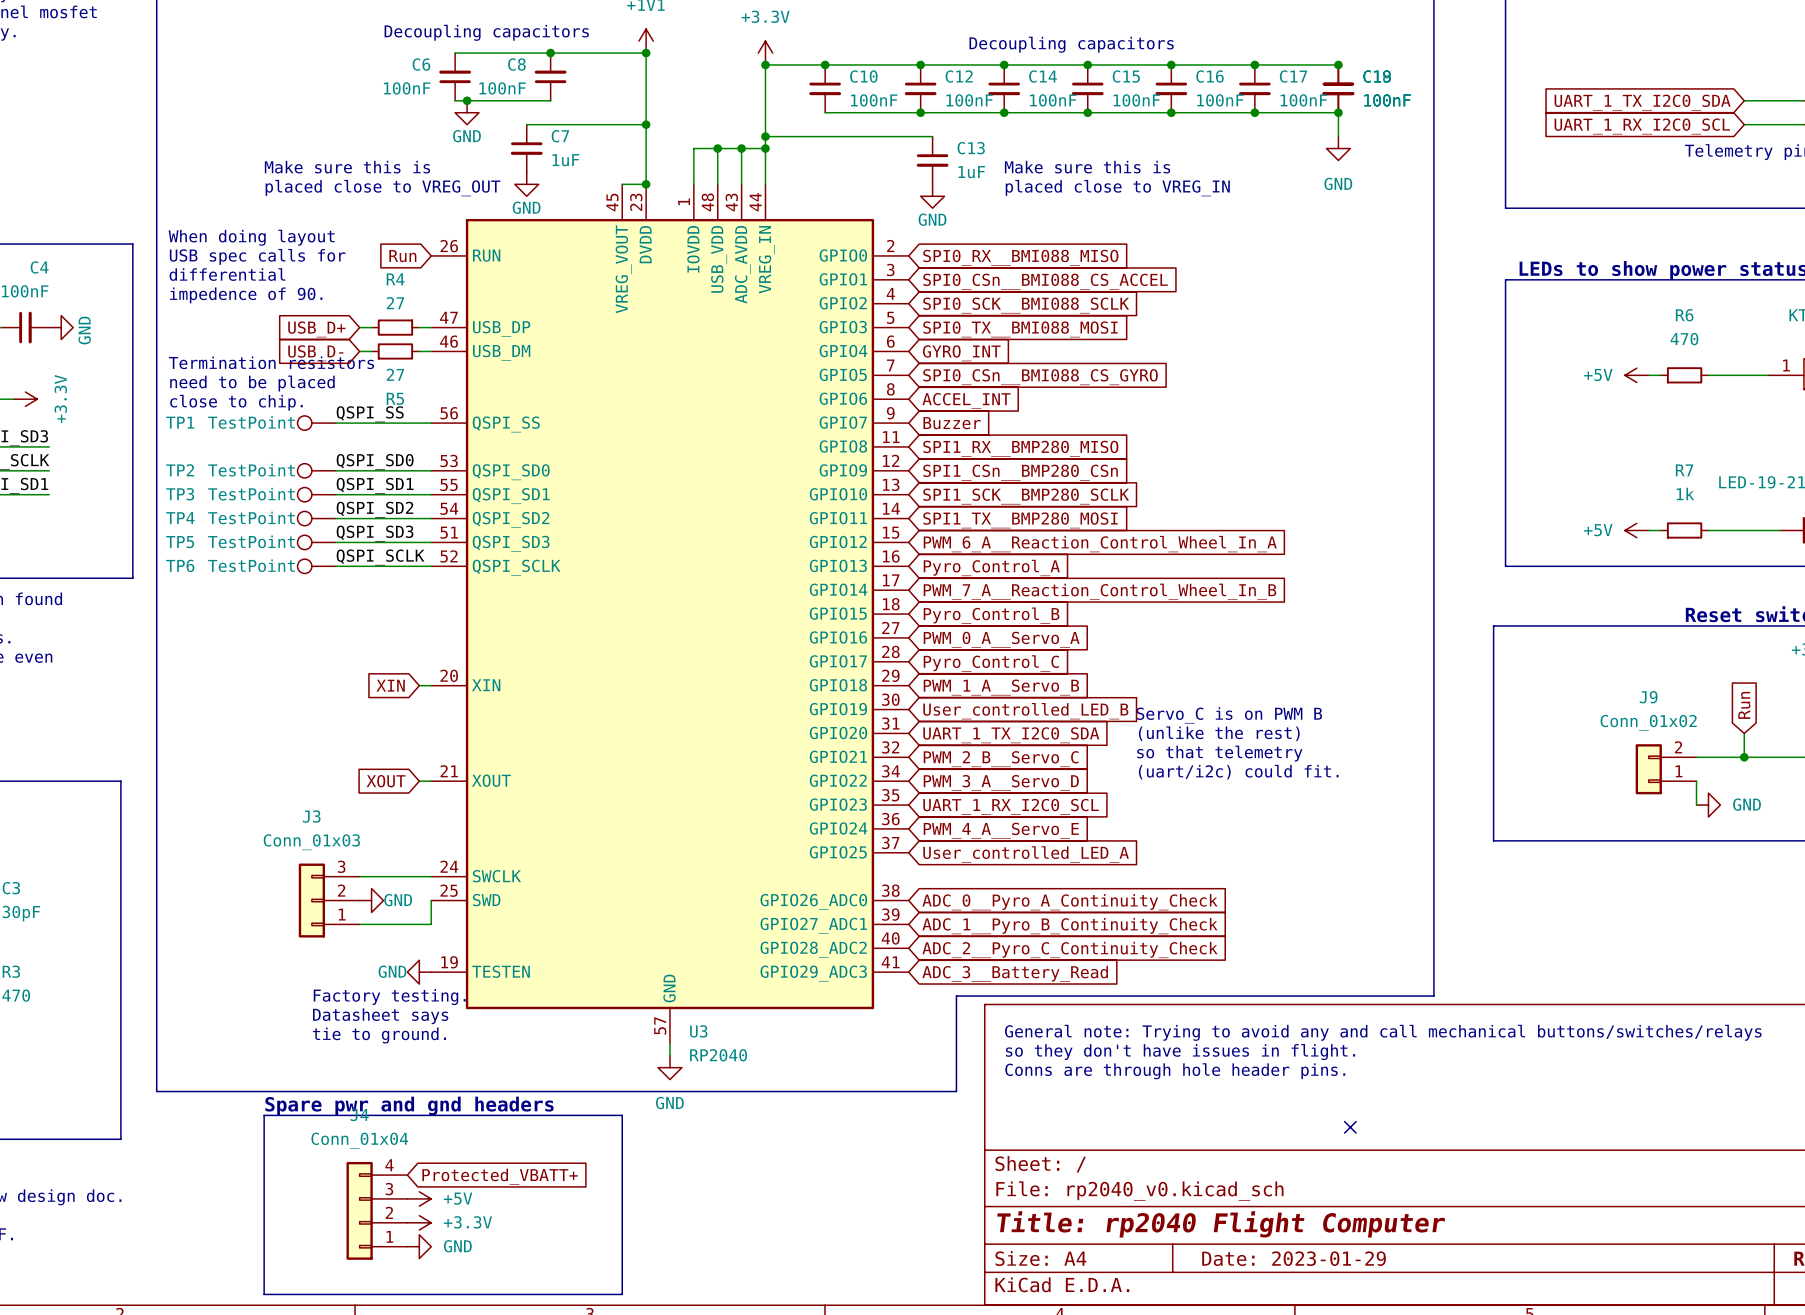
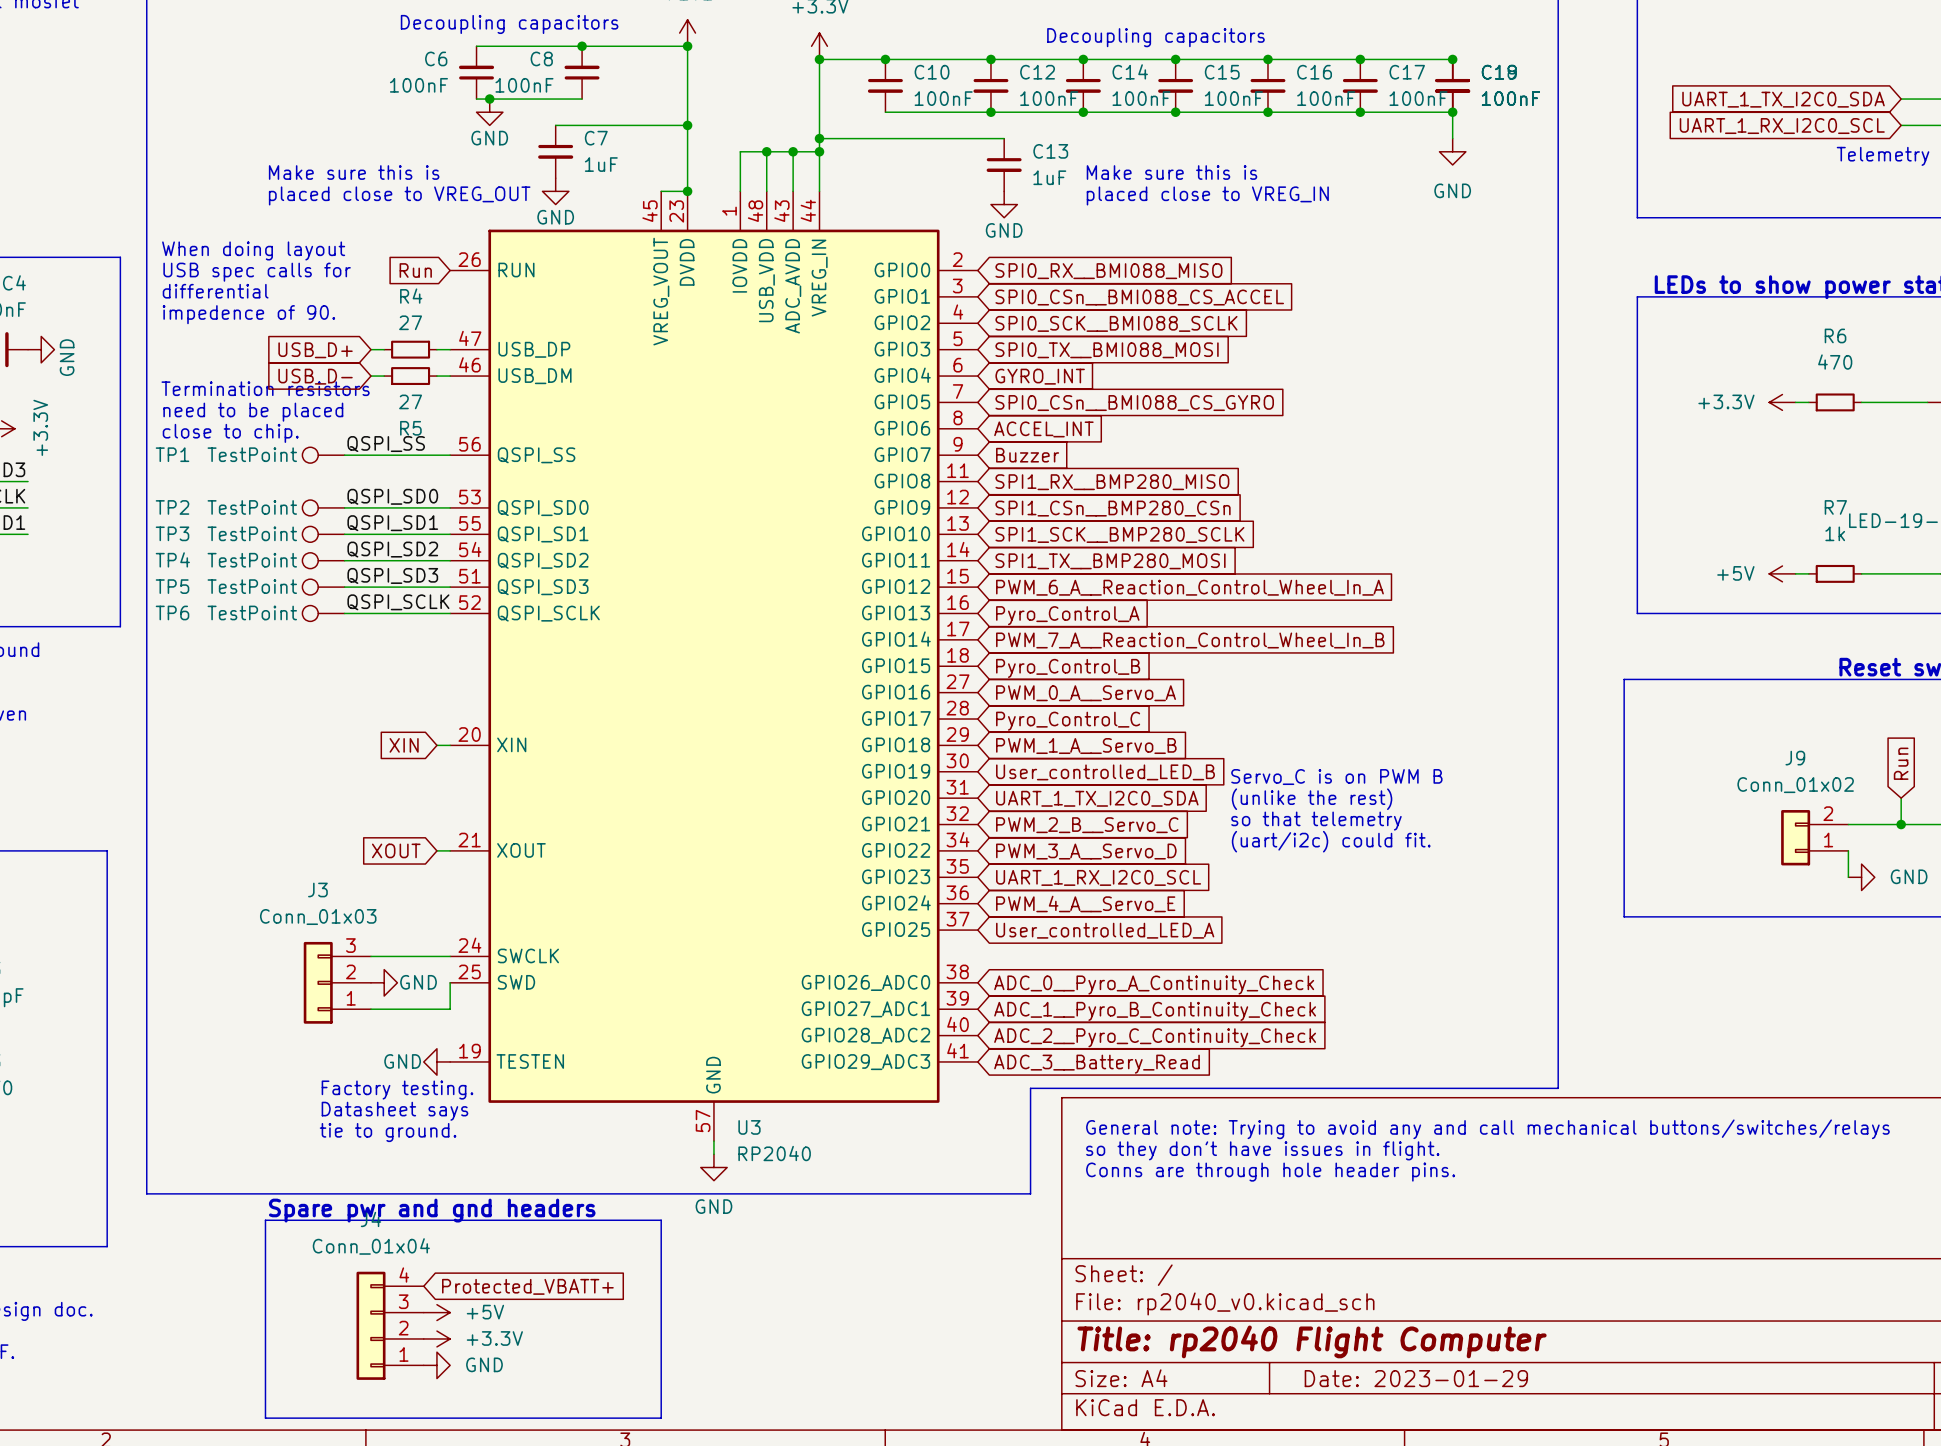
power symbol: +5V (1636, 375) -> +3.3V (1782, 402)
no-connect mark: (1350, 1127) -> none

